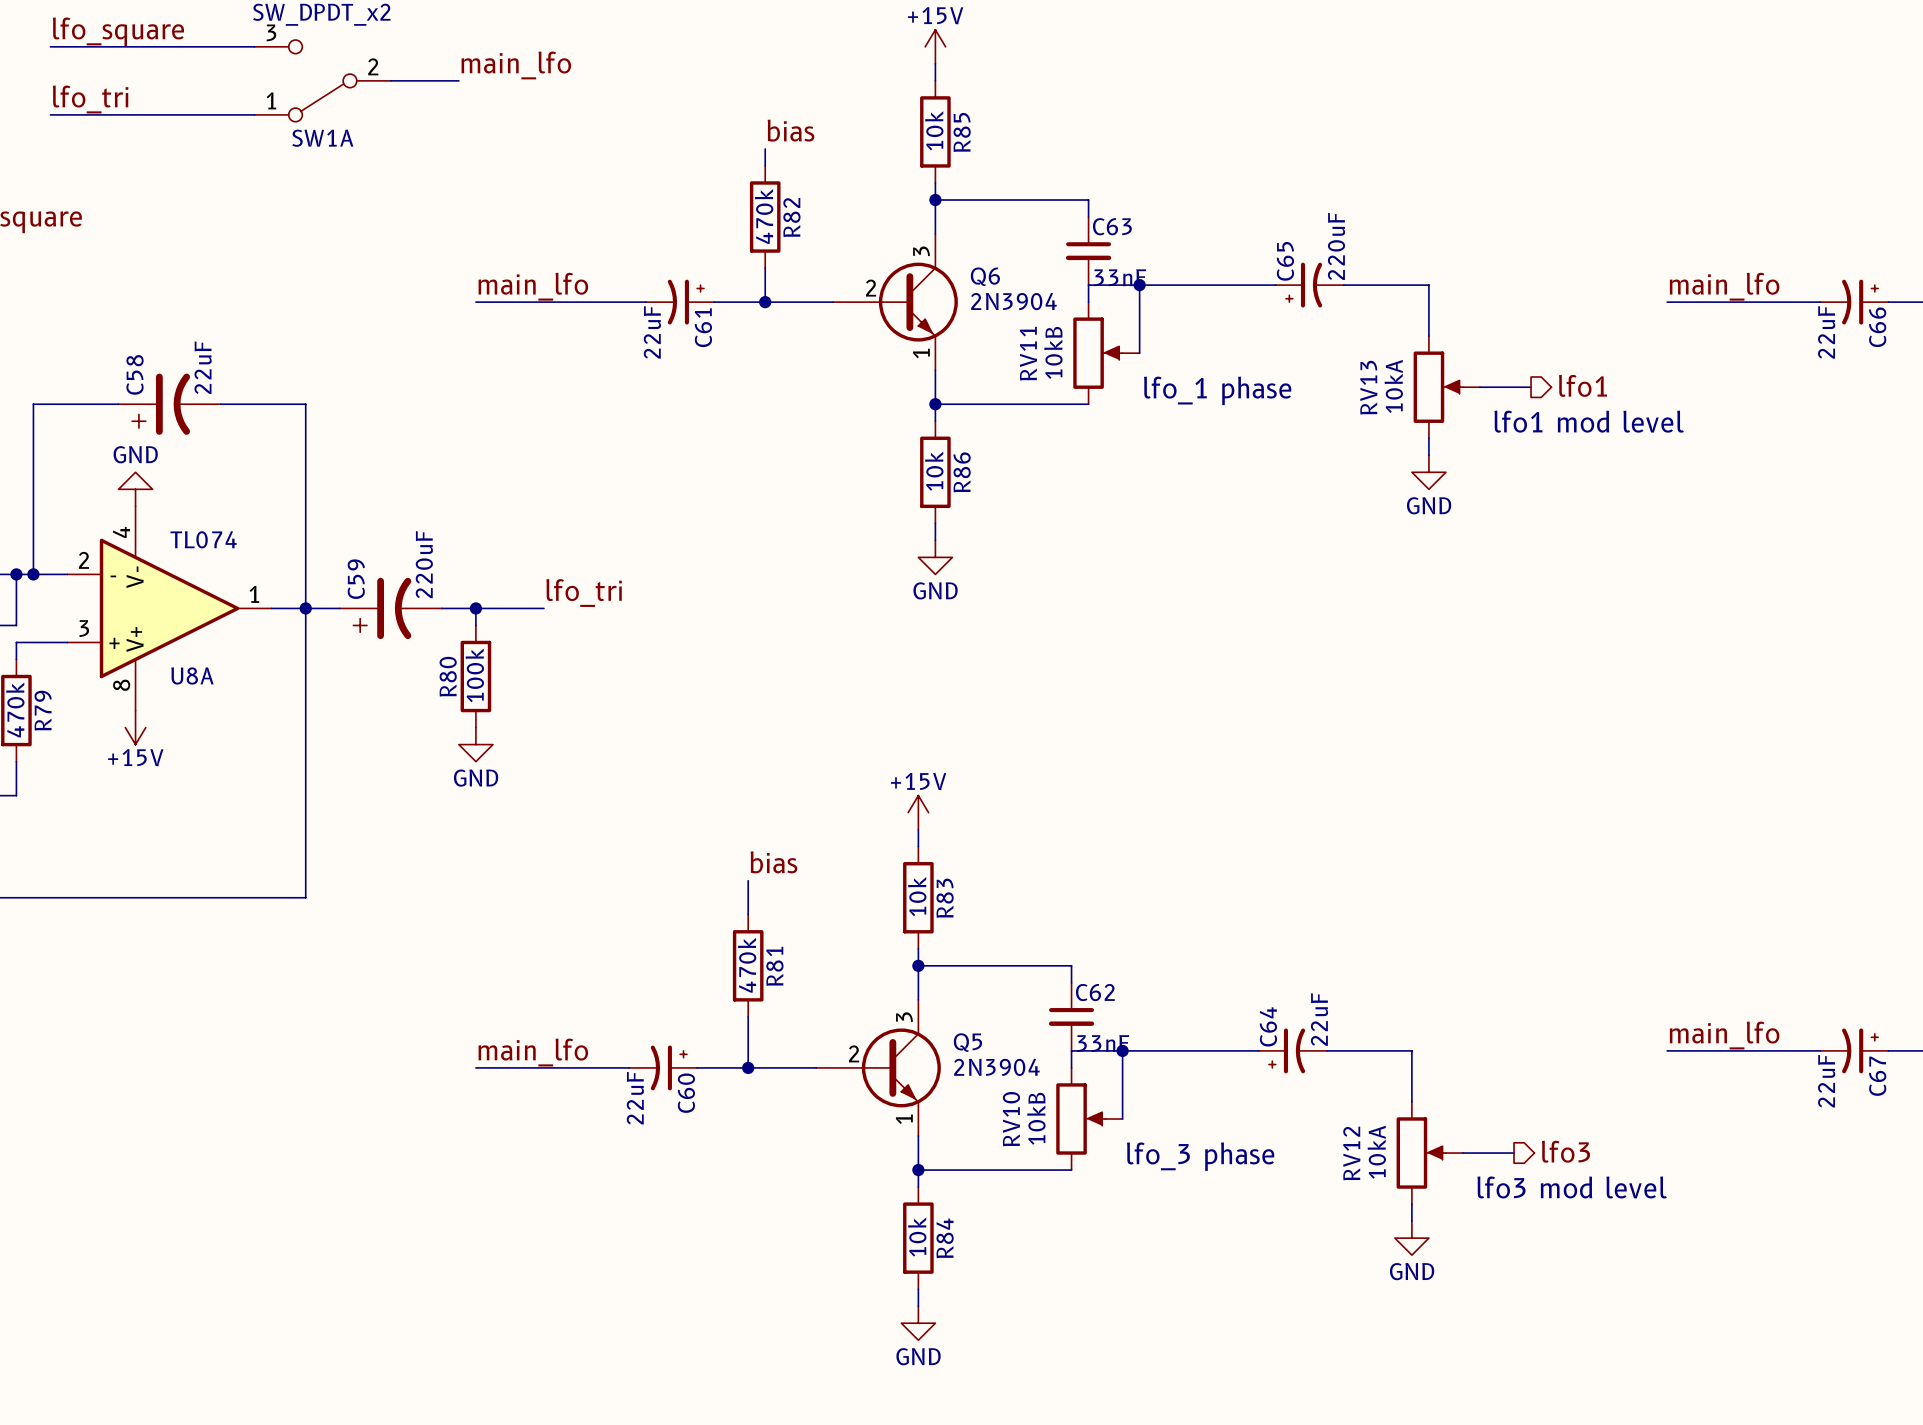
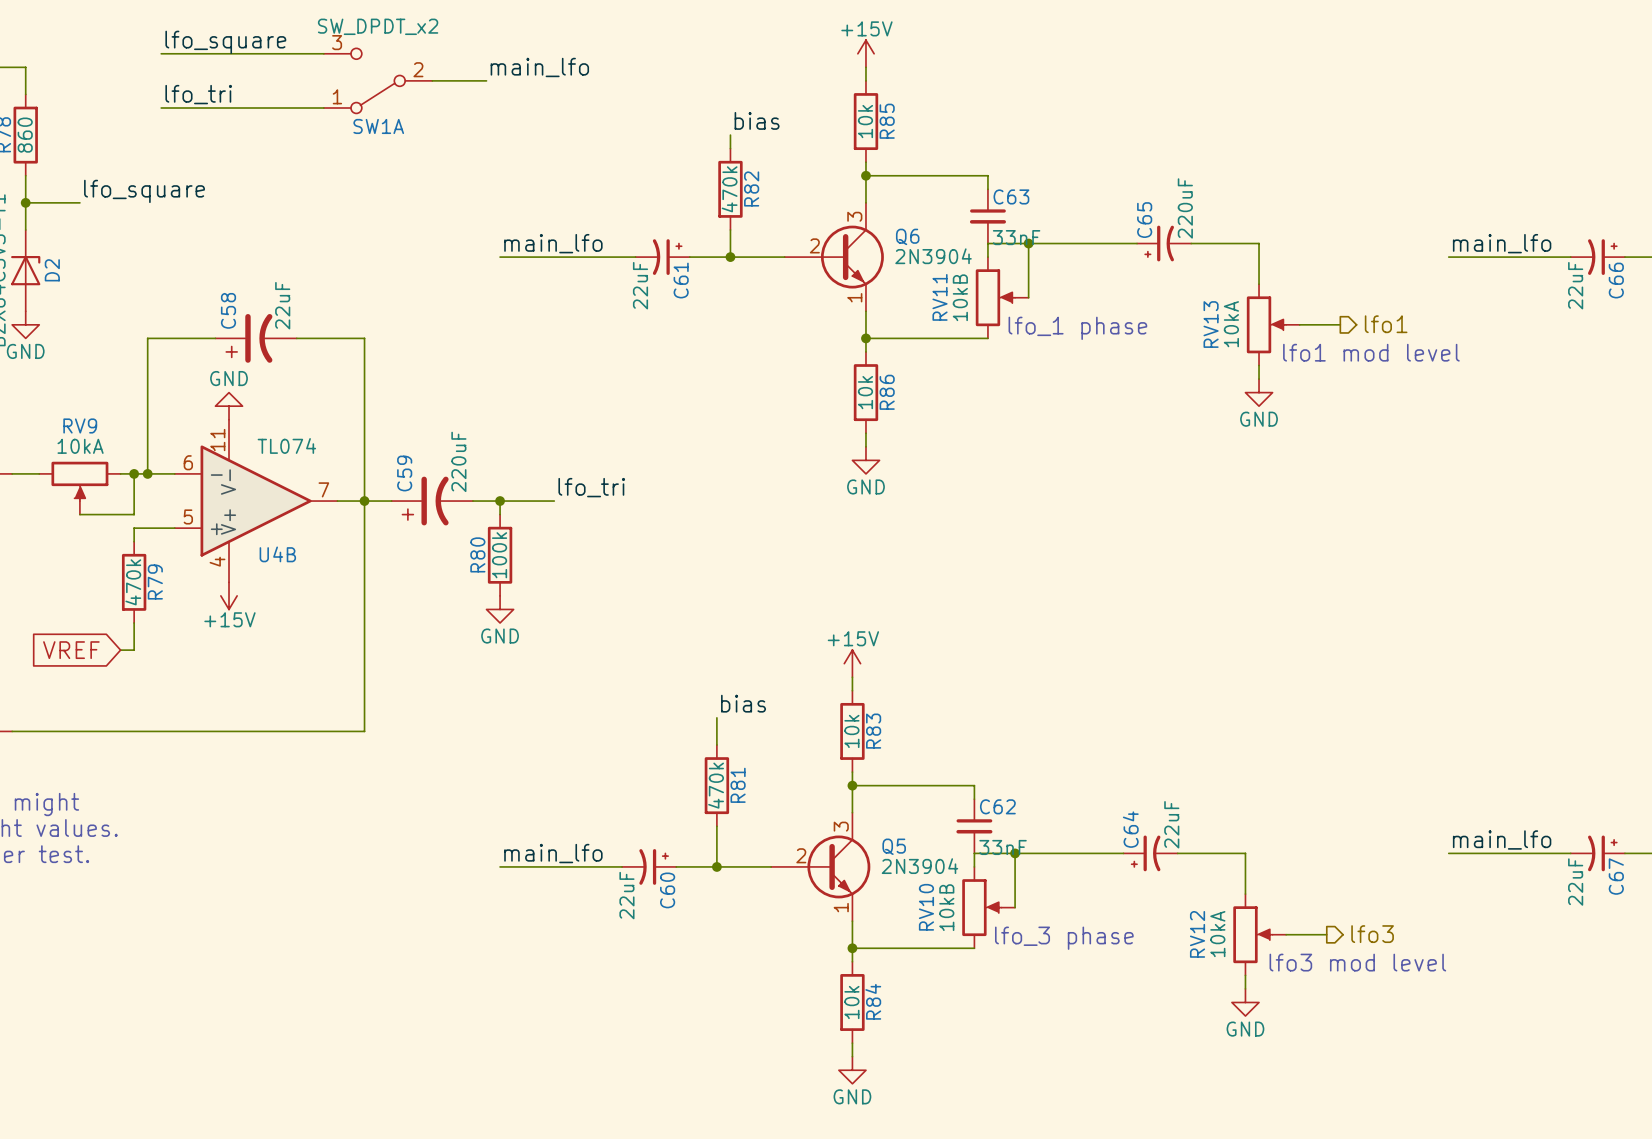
U8A pin number: 4 (121, 532) -> 11 (217, 440)
U8A pin number: 2 (83, 560) -> 6 (188, 462)
U8A pin number: 1 (254, 594) -> 7 (323, 489)
U8A pin number: 3 (84, 628) -> 5 (188, 516)
U8A name: U8A (192, 675) -> U4B (277, 554)
U8A pin number: 8 (121, 685) -> 4 (217, 561)

